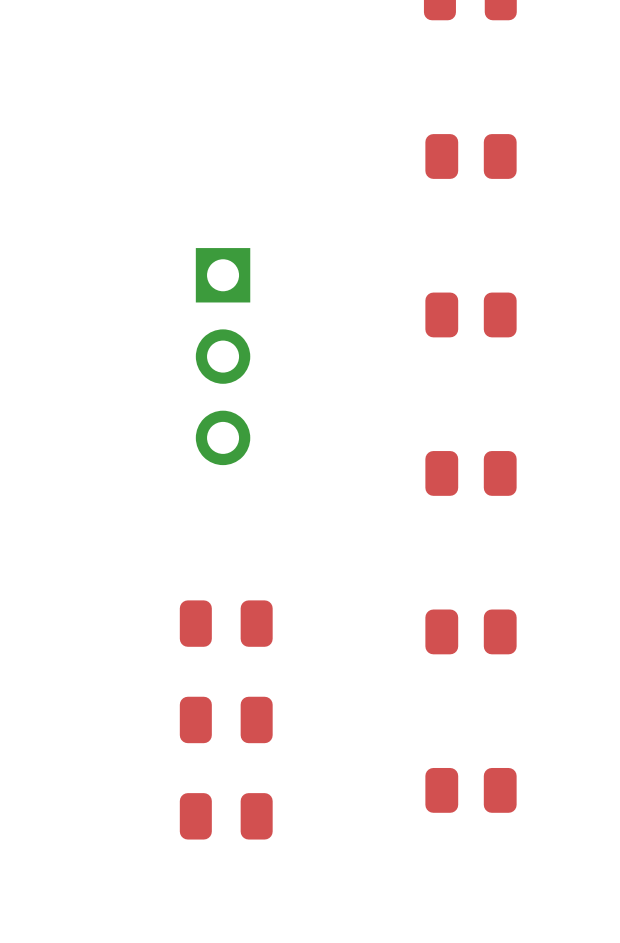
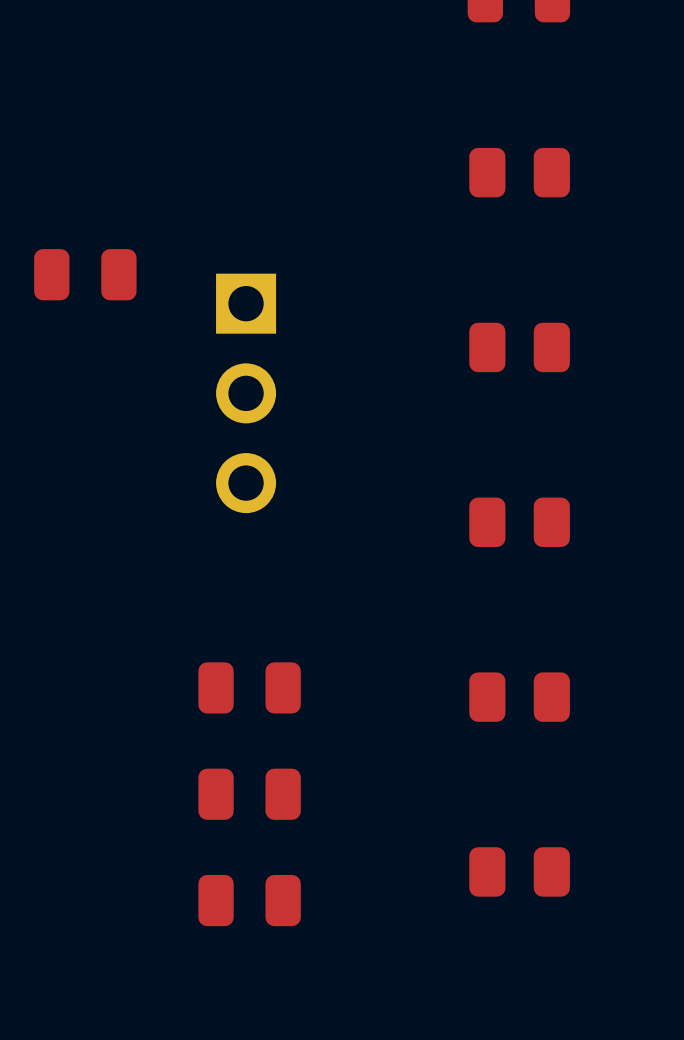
part: none -> (85, 274)

